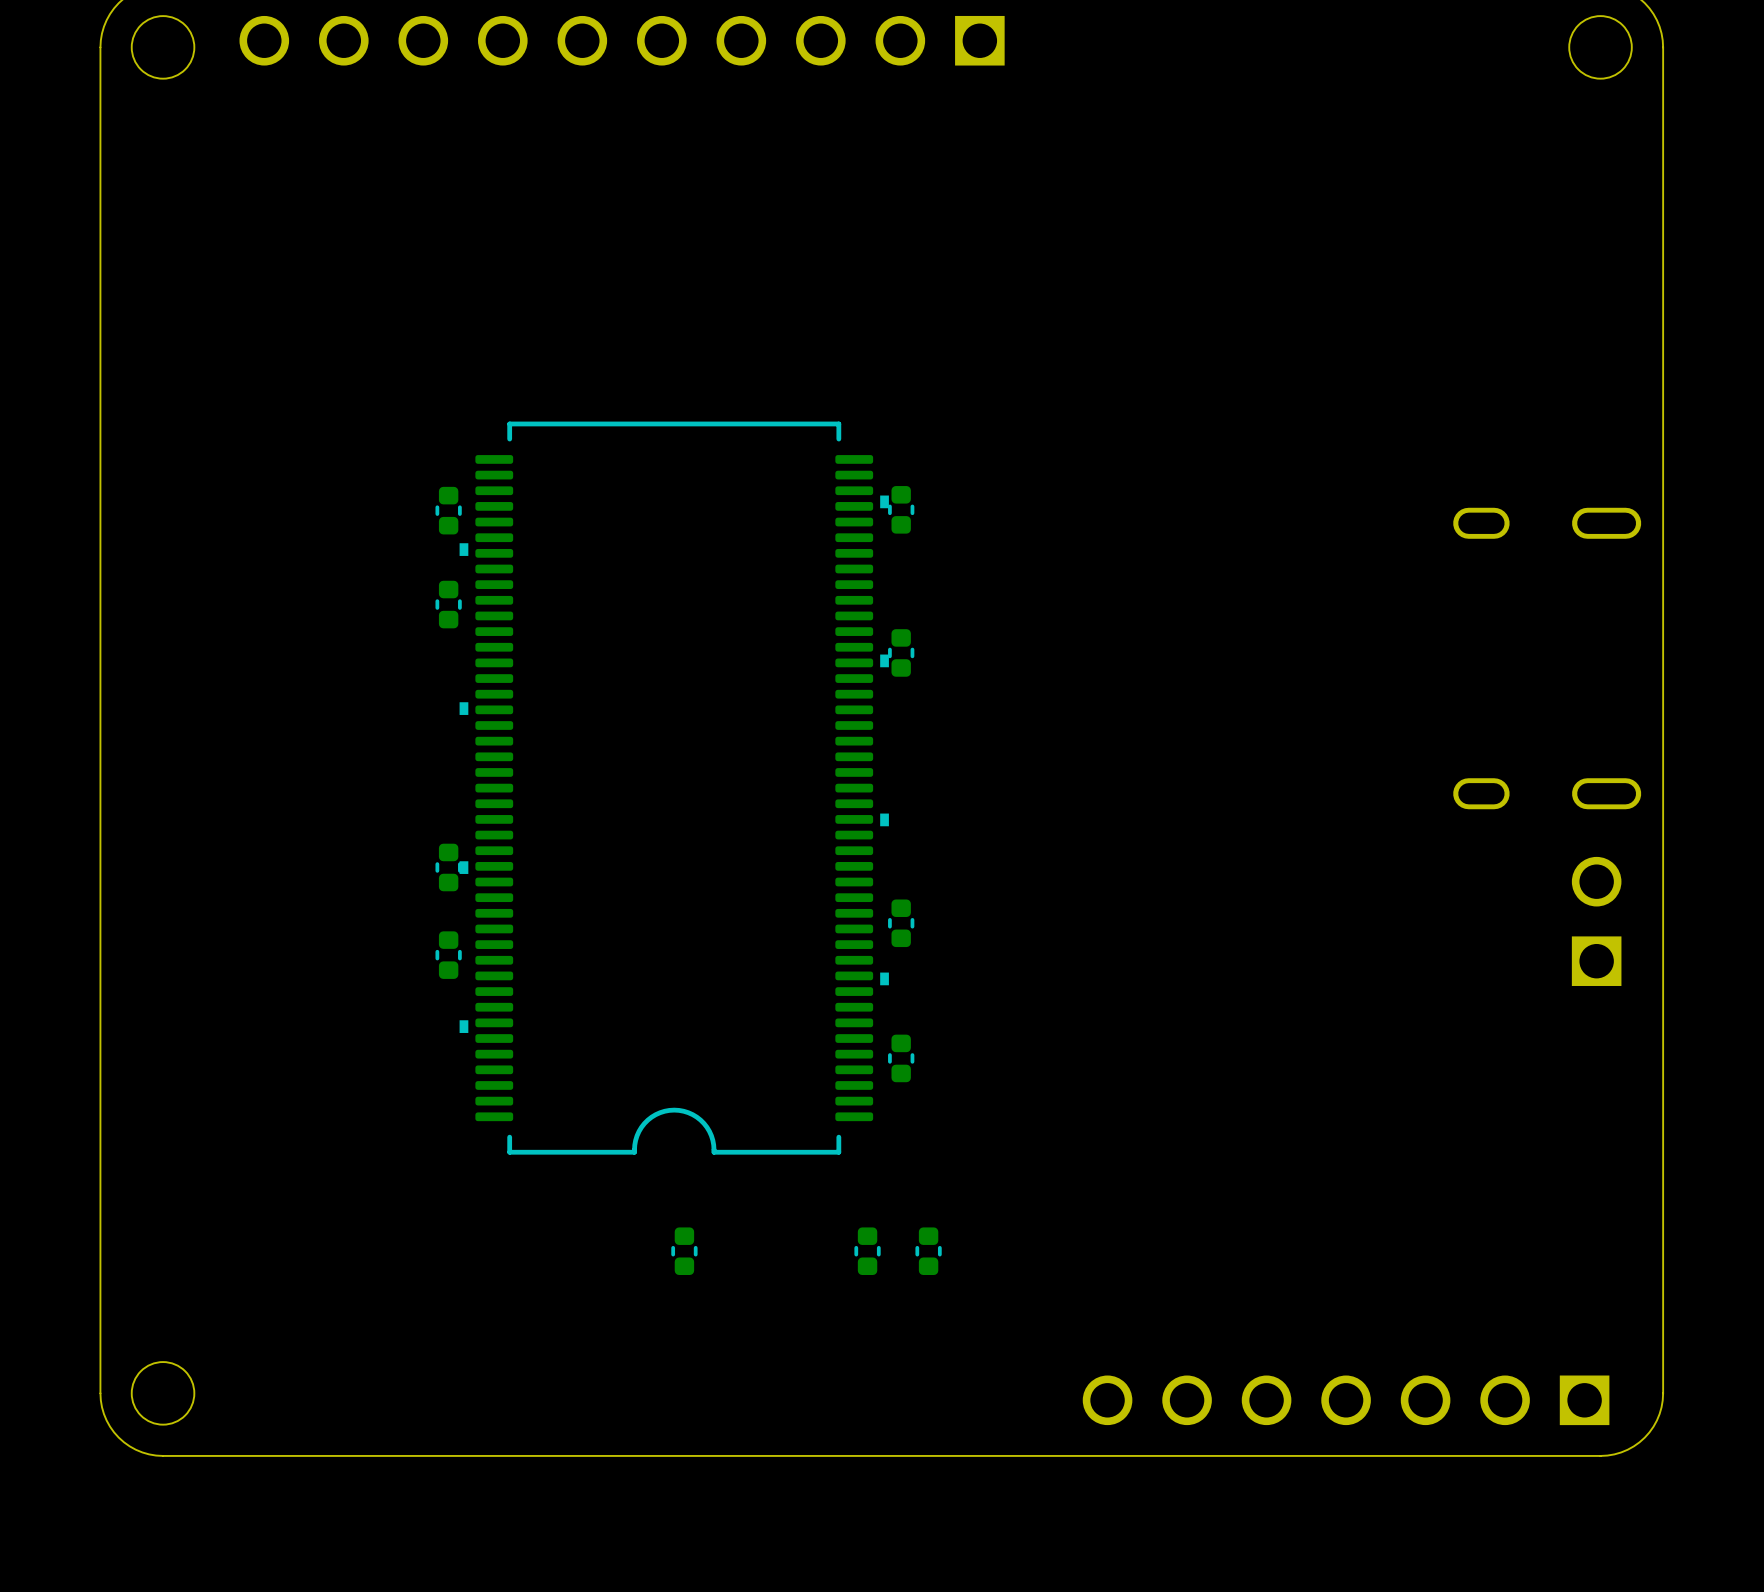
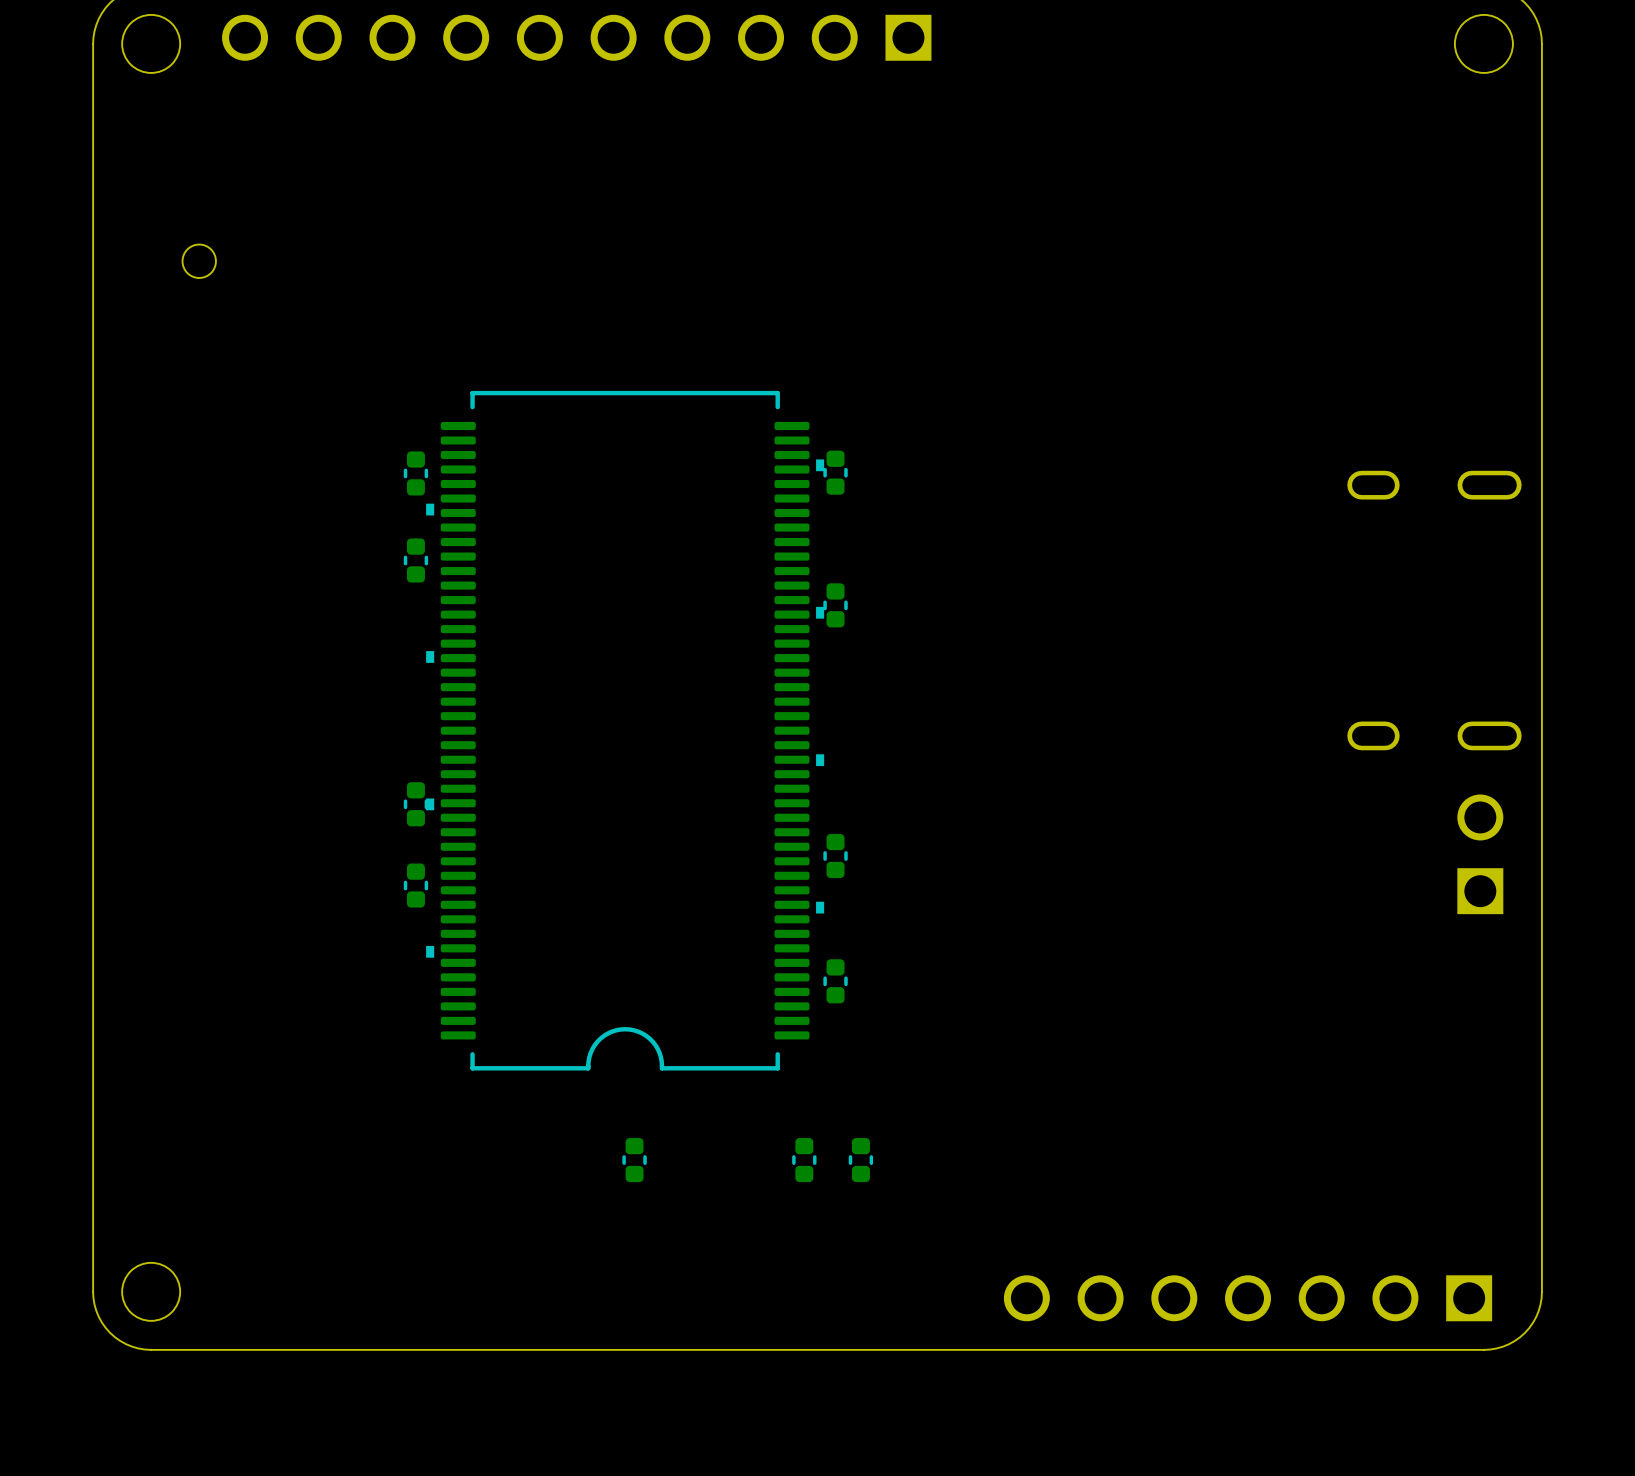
round board edge: none -> [181, 243, 217, 279]

